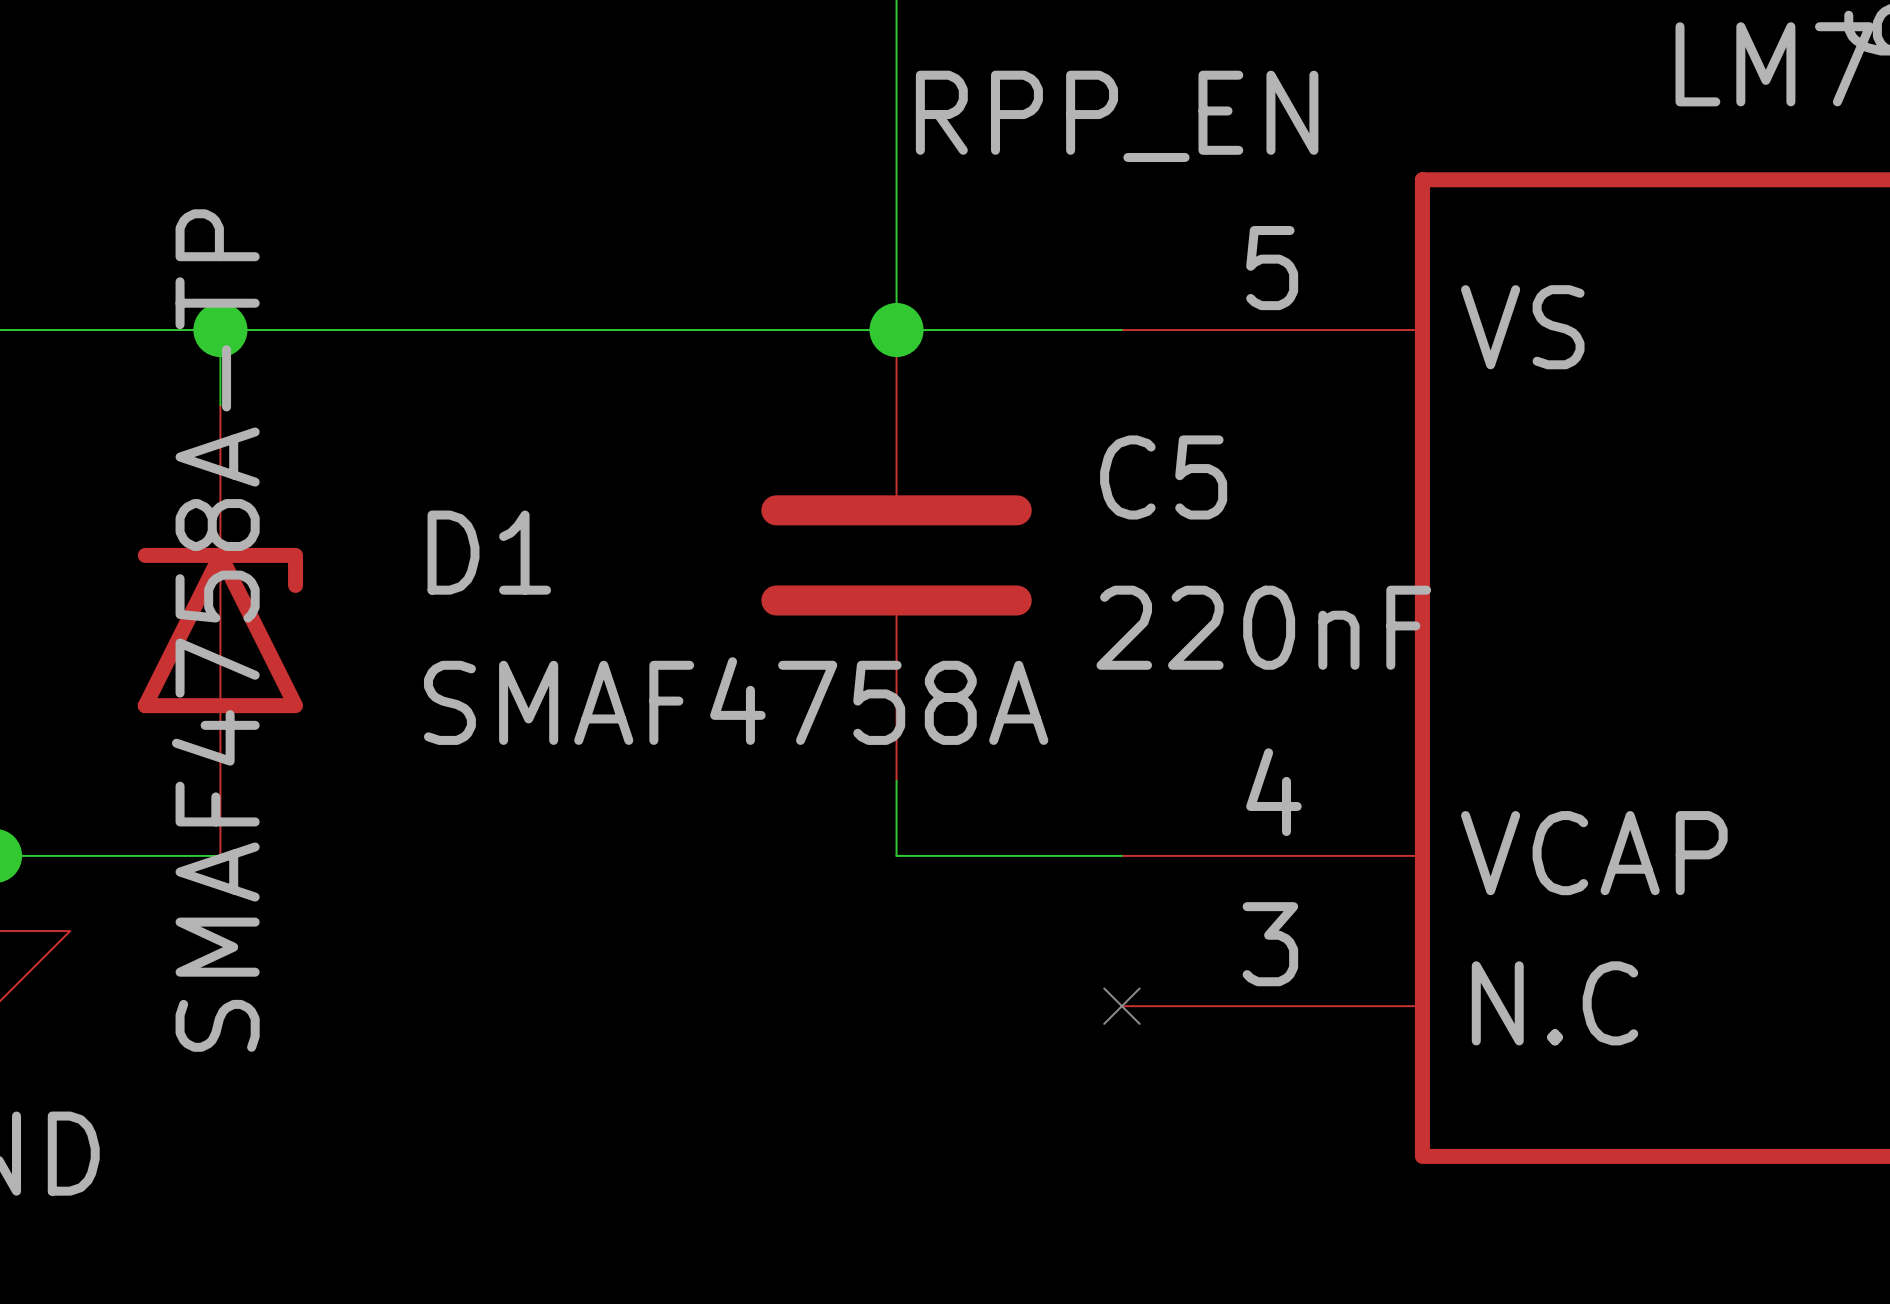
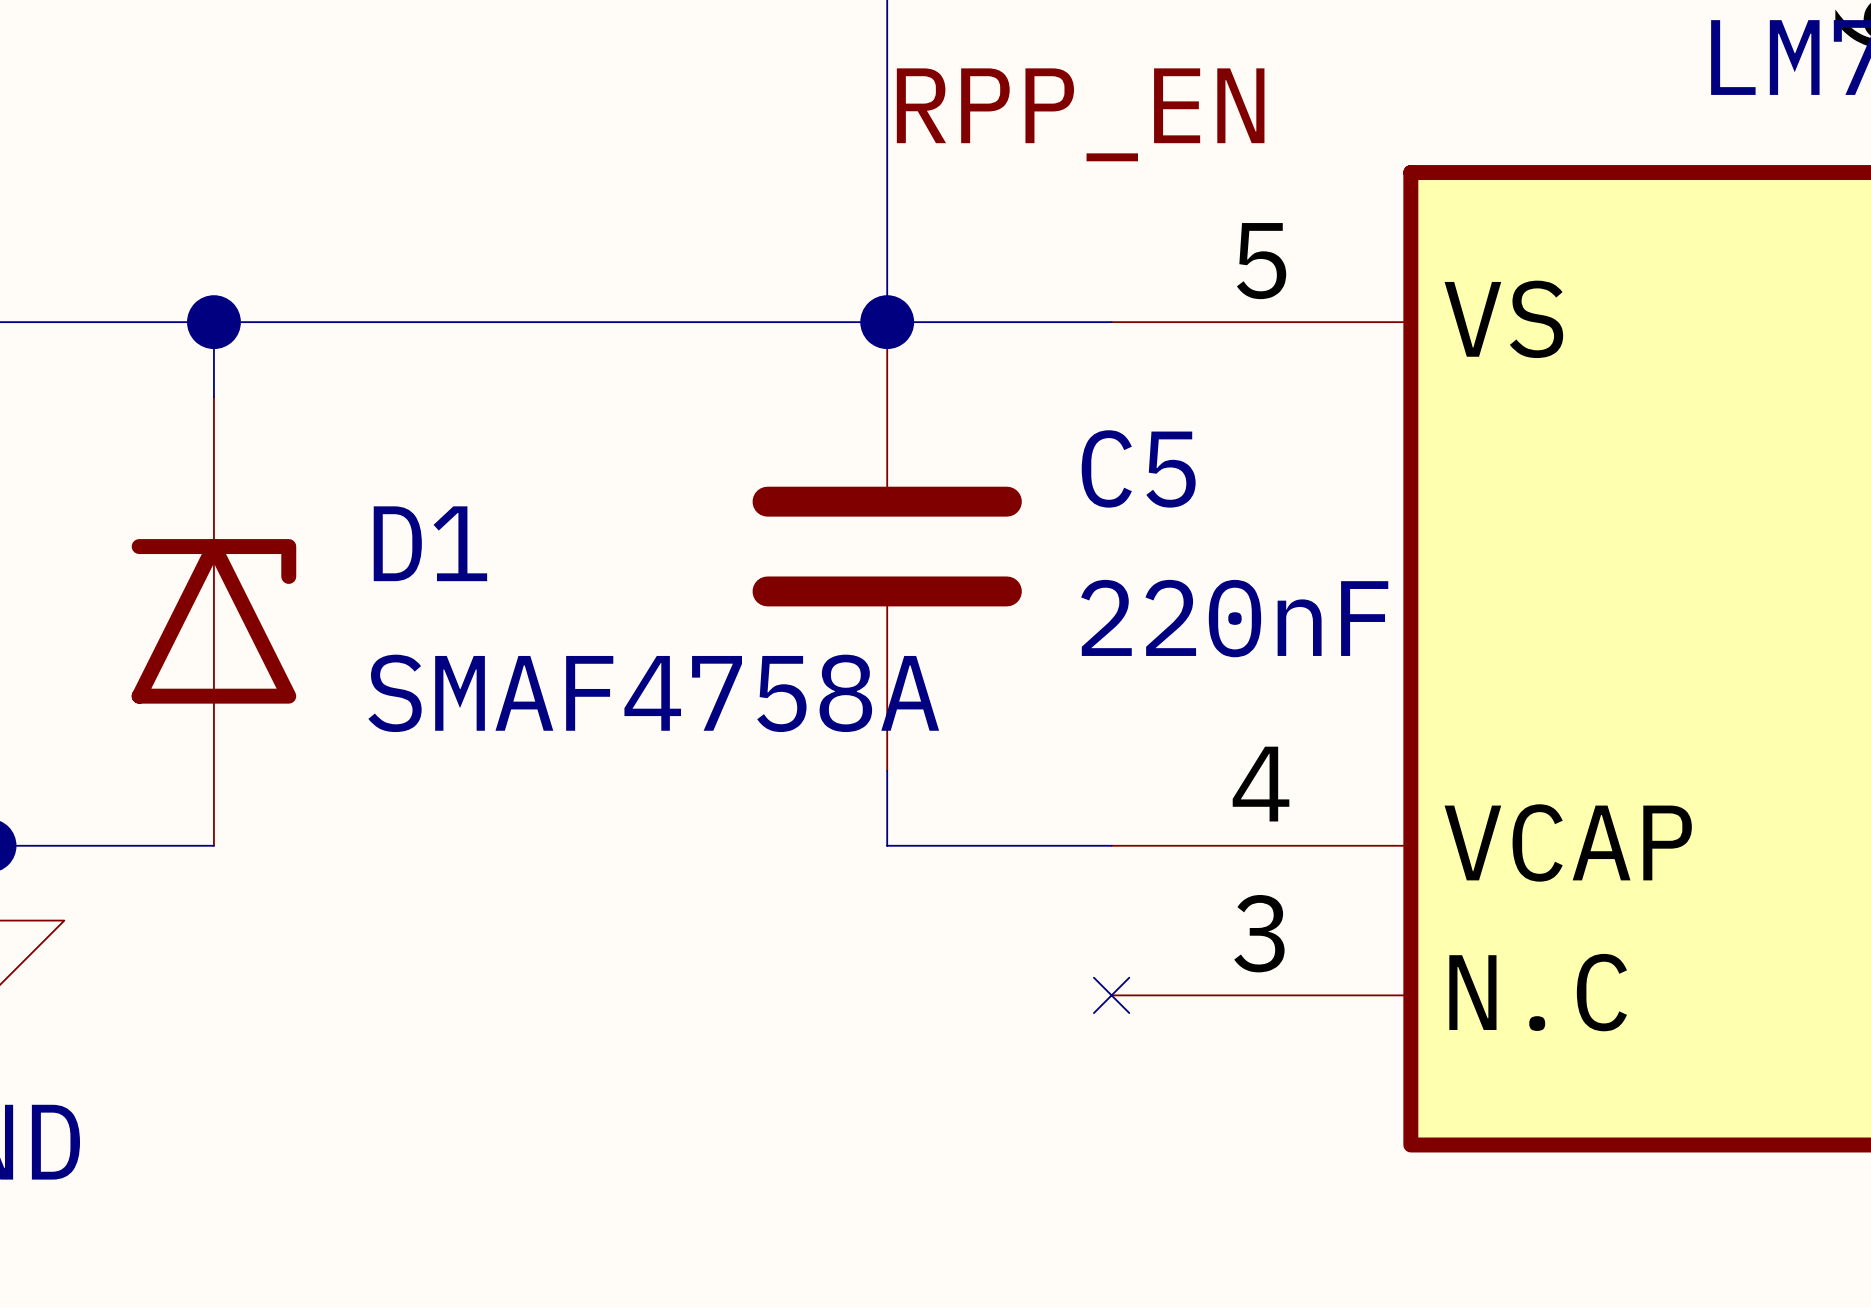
D1 name position: D1 (489, 552) -> D1 (430, 543)
D1 text: SMAF4758A-TP (215, 630) -> none
D1 value position: SMAF4758A (736, 701) -> SMAF4758A (653, 693)

